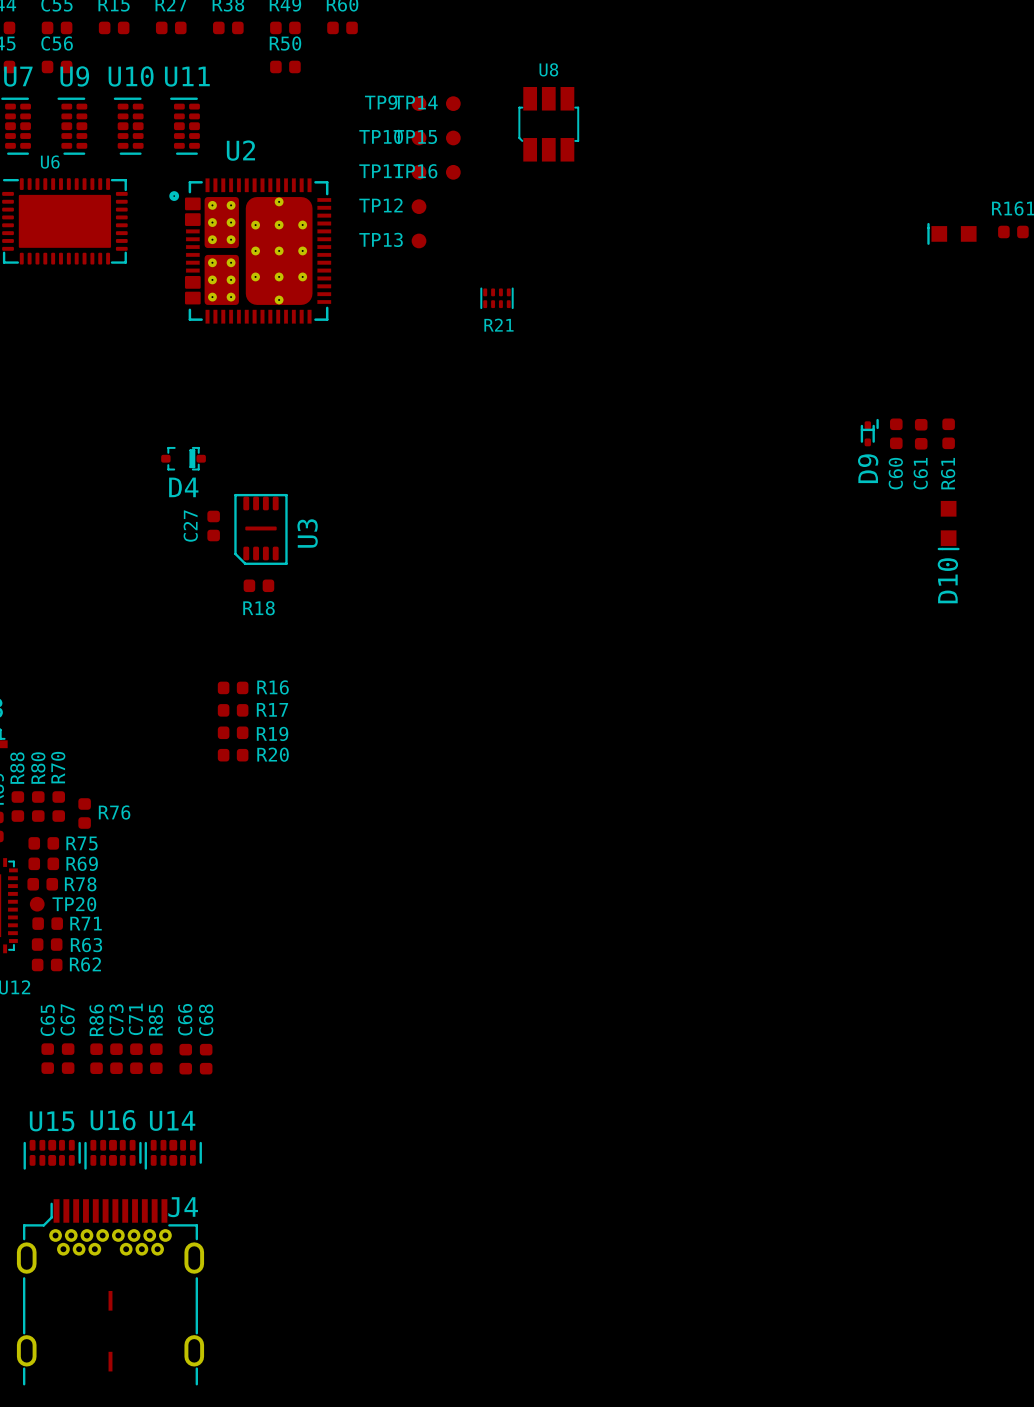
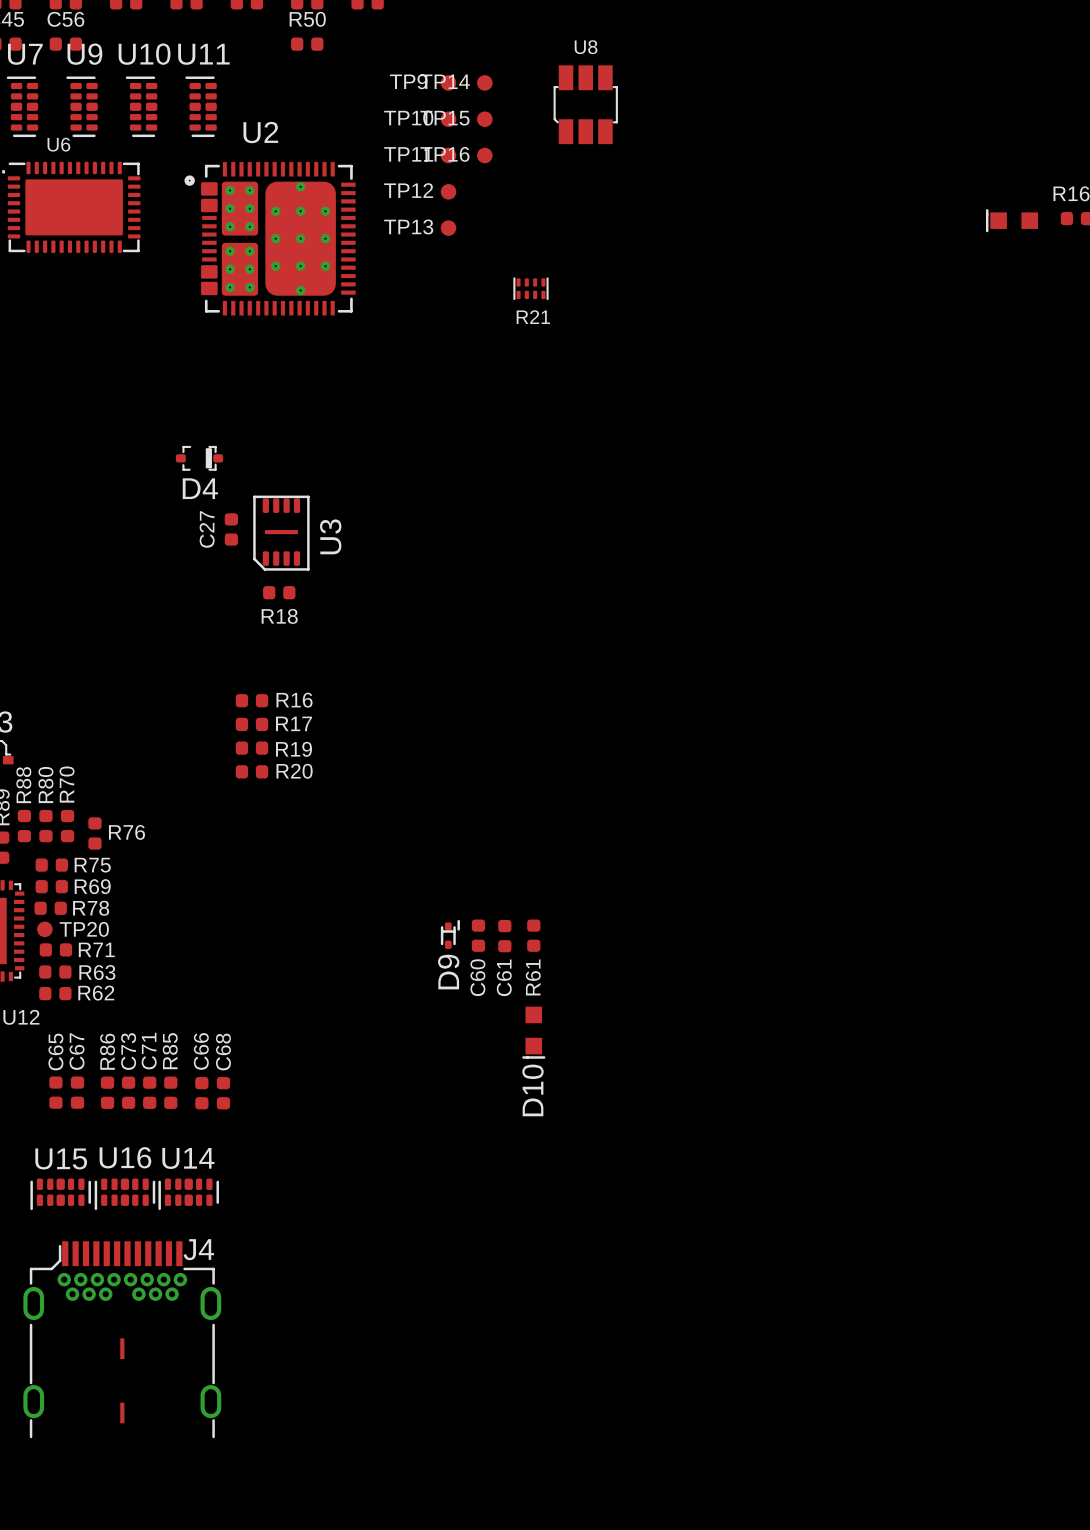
D9 position: (869, 432) -> (450, 934)
C60 position: (896, 433) -> (478, 935)
R61 position: (948, 433) -> (533, 935)
C61 position: (921, 434) -> (504, 936)
D10 position: (948, 525) -> (533, 1032)

